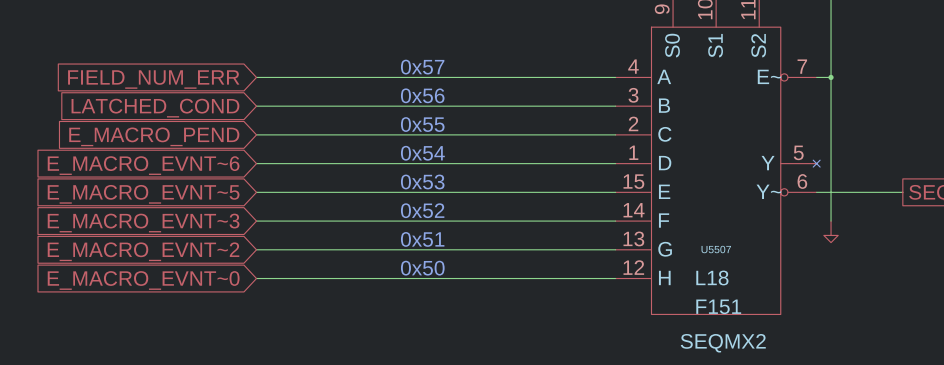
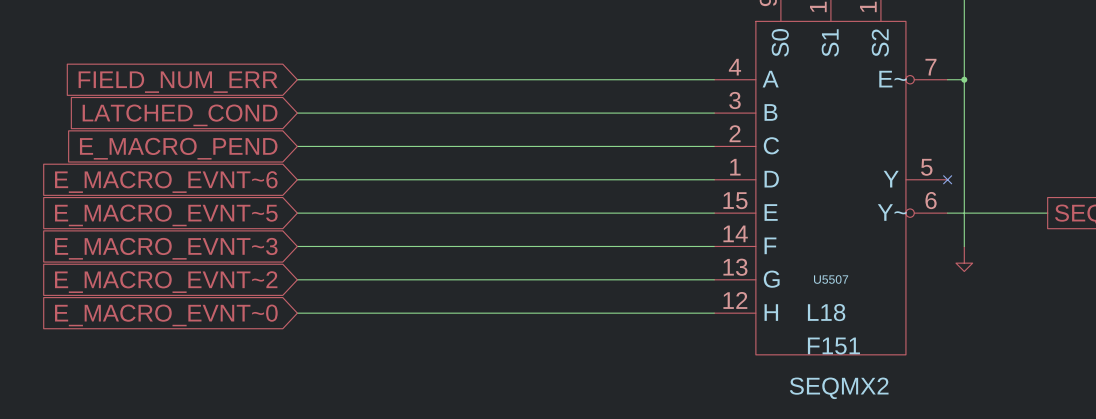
text: 0x57 (422, 67) -> none
text: 0x56 (422, 95) -> none
text: 0x55 (422, 124) -> none
text: 0x54 (422, 153) -> none
text: 0x53 (422, 181) -> none
text: 0x52 (422, 210) -> none
text: 0x51 (422, 239) -> none
text: 0x50 (422, 268) -> none

